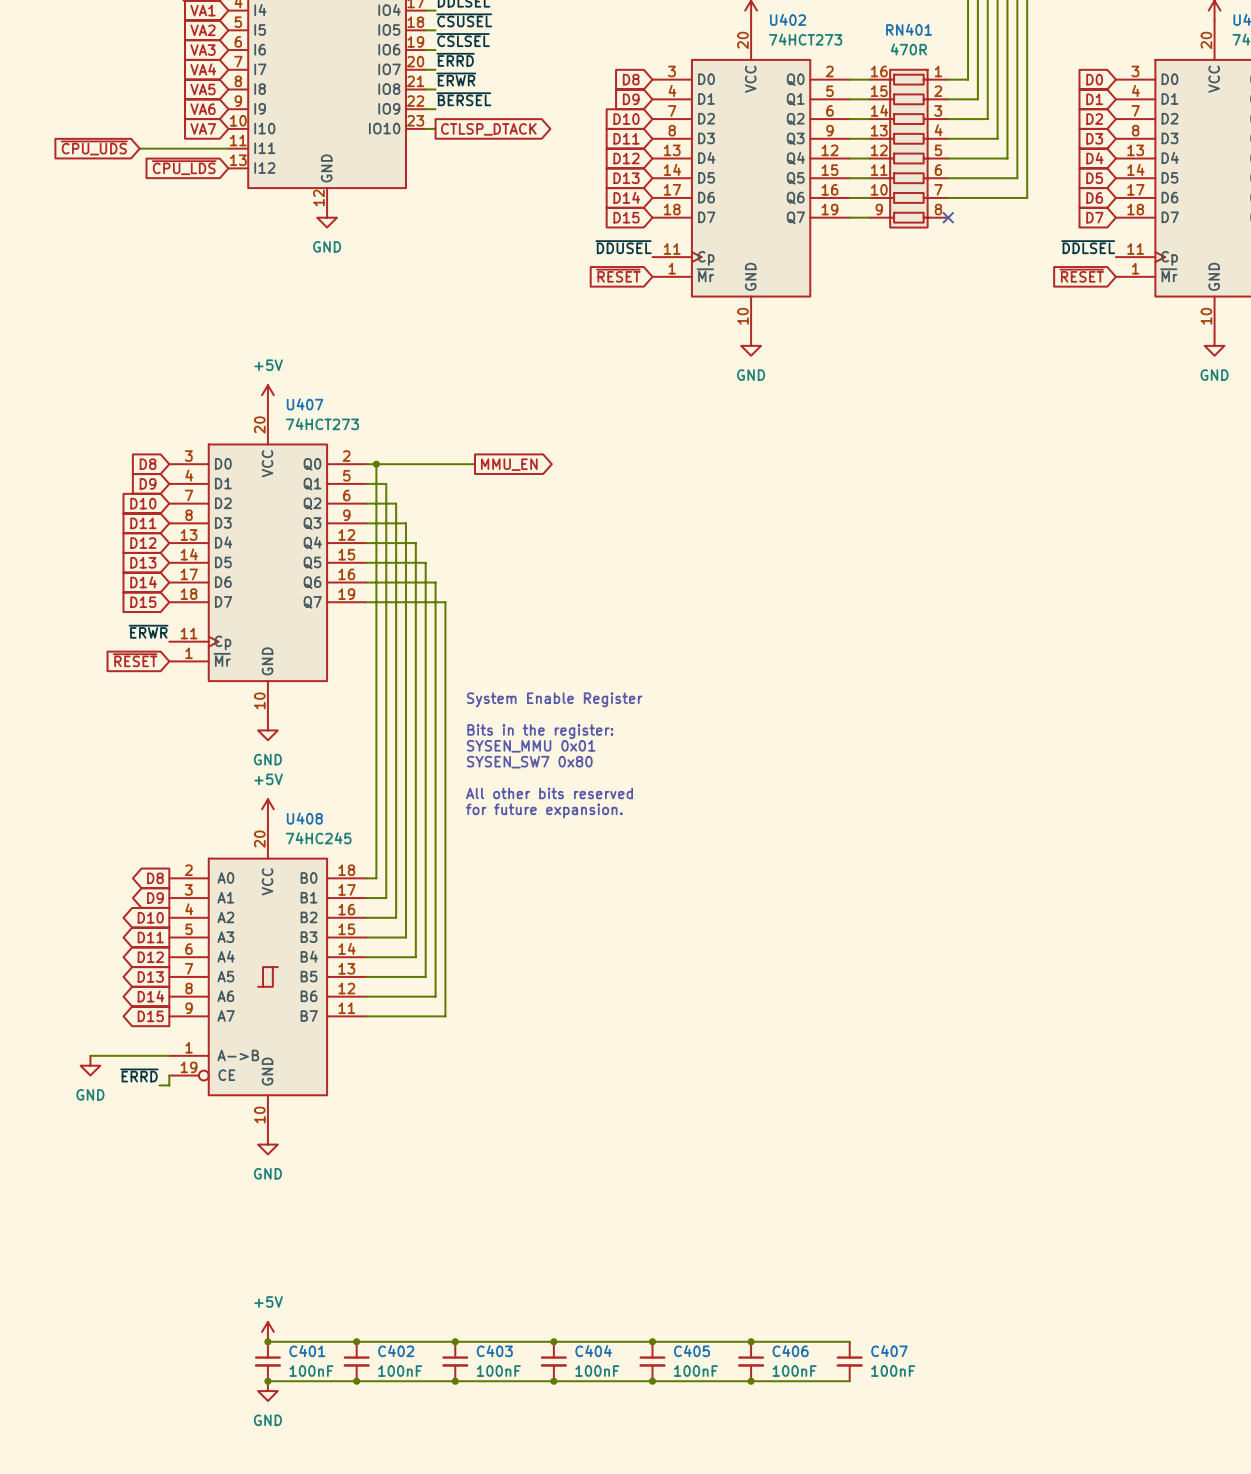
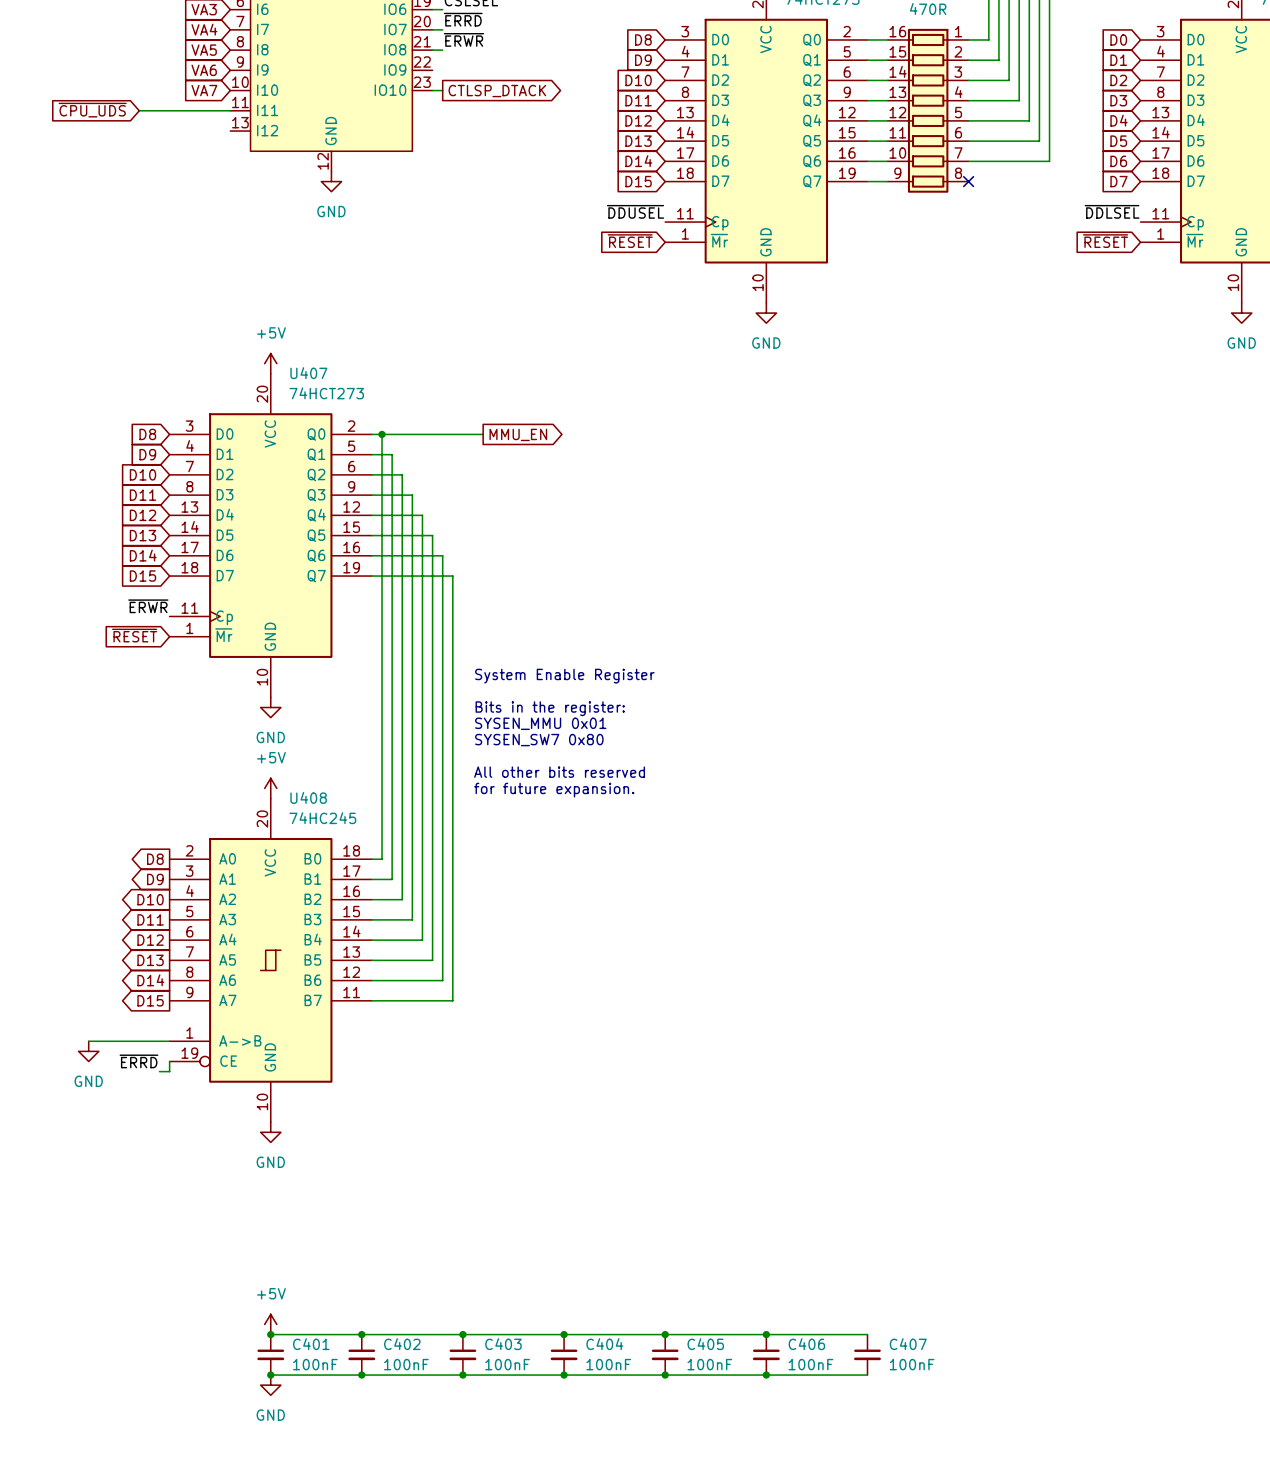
label: ~{BERSEL} (463, 99) -> none
wire: (425, 109) (435, 109) -> none
global label: ~{CPU_LDS} (184, 167) -> none

